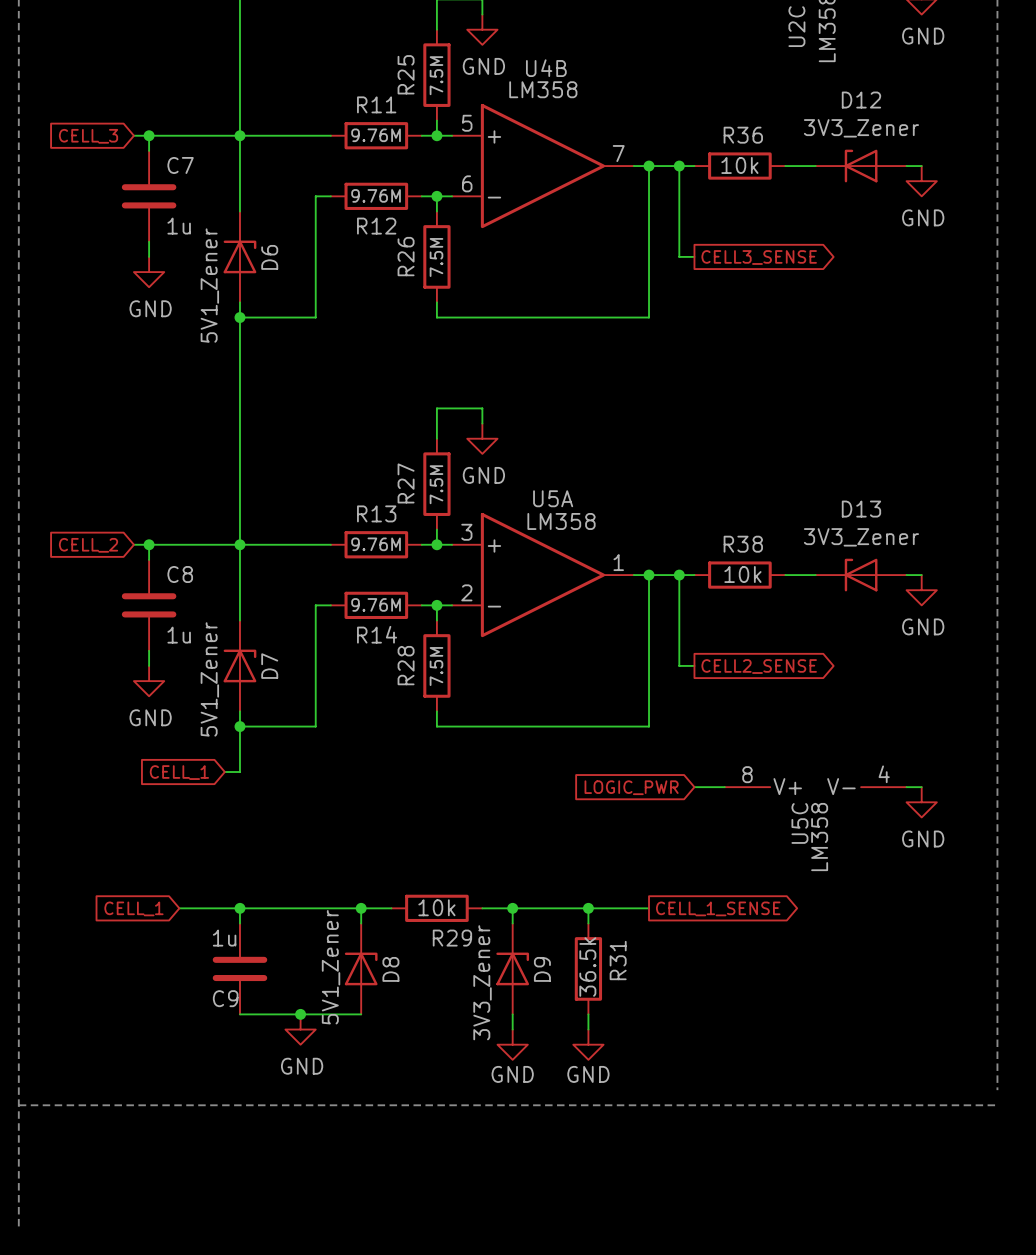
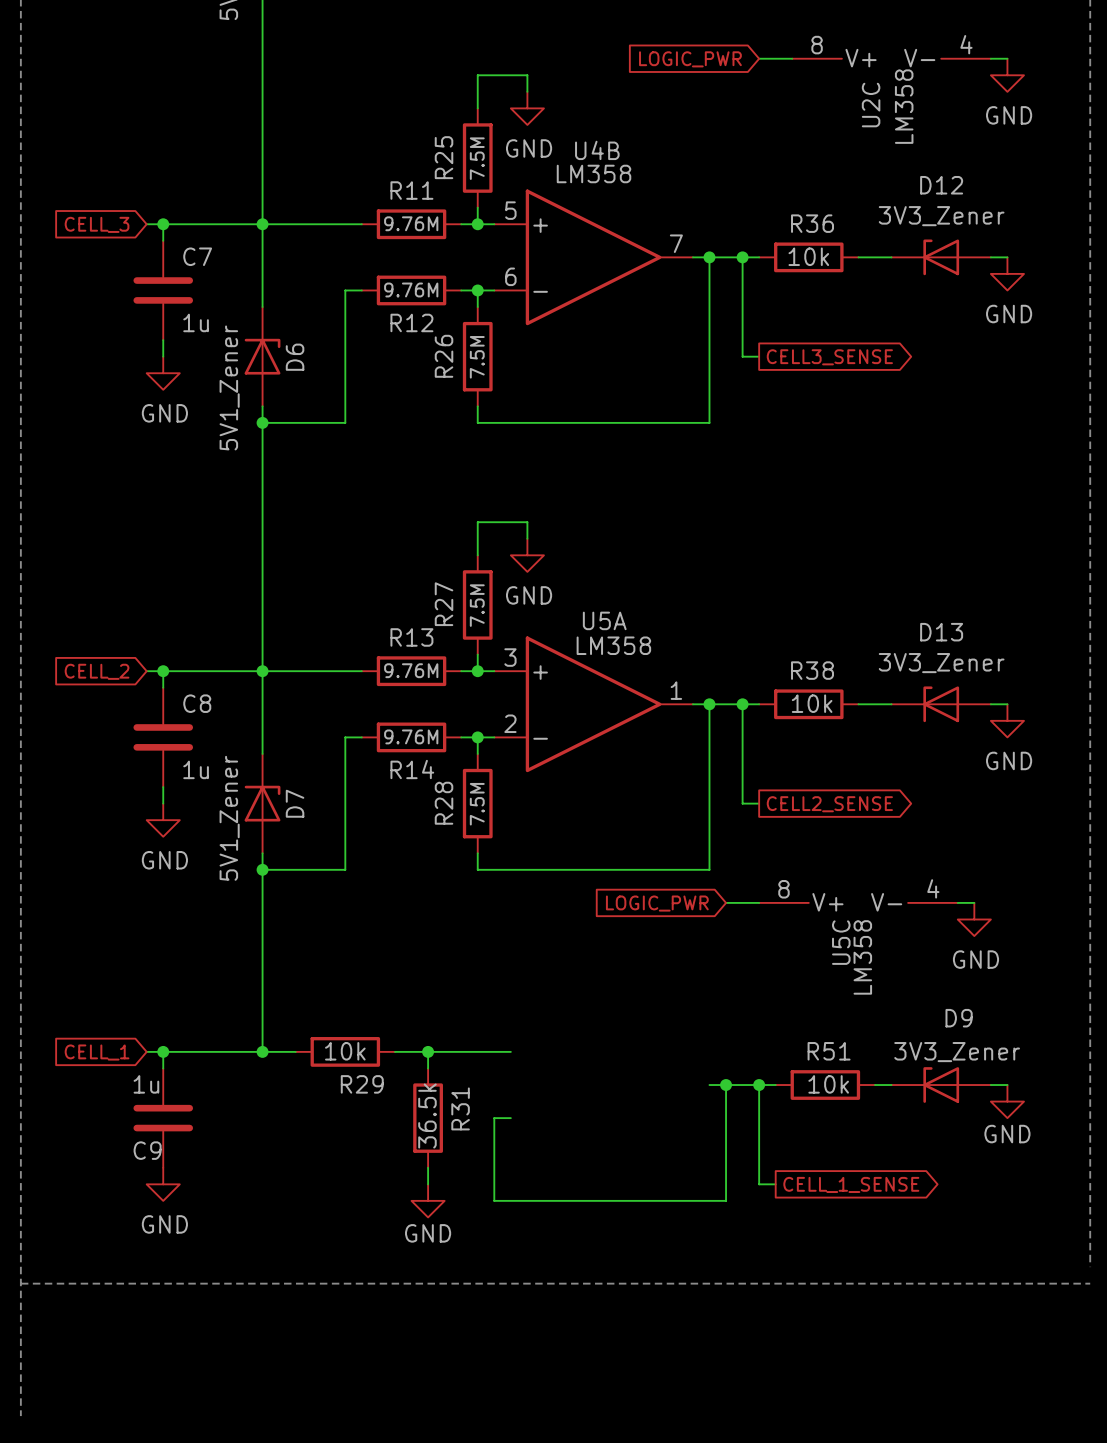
global label: CELL_1 (179, 772) -> none
wire: (224, 772) (239, 772) -> (262, 1051) (262, 919)
global label position: LOGIC_PWR (631, 787) -> LOGIC_PWR (657, 903)
wire: (694, 787) (724, 787) -> (726, 902) (759, 902)
U5C position: (815, 787) -> (858, 902)
wire: (906, 787) (921, 787) -> (957, 902) (974, 902)
power symbol position: GND (921, 802) -> GND (974, 919)
wire: none -> (146, 1051) (295, 1051)
junction: none -> (163, 1051)
wire: none -> (394, 1051) (510, 1051)
global label position: CELL_1 (133, 908) -> CELL_1 (97, 1052)
wire: (179, 908) (391, 908) -> (428, 1051) (428, 1068)
wire: (239, 908) (239, 923) -> (163, 1051) (163, 1068)
junction position: (239, 908) -> (262, 1051)
wire: (361, 908) (361, 923) -> none
junction position: (361, 908) -> (428, 1051)
R29 position: (436, 908) -> (345, 1051)
wire: (482, 908) (649, 908) -> none
wire: (512, 908) (512, 923) -> none
junction: (512, 908) -> none
wire: (588, 908) (588, 923) -> none
junction: (588, 908) -> none
global label position: CELL_1_SENSE (718, 908) -> CELL_1_SENSE (851, 1184)
wire: none -> (709, 1085) (775, 1085)
wire: none -> (726, 1085) (726, 1200) (494, 1200) (494, 1118) (510, 1118)
junction: none -> (726, 1085)
wire: none -> (759, 1085) (759, 1184) (775, 1184)
junction: none -> (759, 1085)
R51: none -> 10k (825, 1085)
wire: none -> (875, 1085) (891, 1085)
wire: none -> (990, 1085) (1007, 1085)
power symbol: none -> GND (1007, 1101)
C9 position: (239, 968) -> (163, 1118)
D8: 5V1_Zener (361, 968) -> none
D9 rotation: 0° (512, 968) -> 90° counterclockwise (941, 1085)
D9 position: (512, 968) -> (941, 1085)
R31 position: (588, 968) -> (428, 1118)
D9 name position: D9 (542, 969) -> D9 (959, 1018)
D9 value position: 3V3_Zener (482, 982) -> 3V3_Zener (957, 1052)
power symbol: none -> GND (163, 1184)
wire: (239, 1014) (361, 1014) -> none
junction: (300, 1014) -> none
wire: (512, 1014) (512, 1029) -> (428, 1167) (428, 1184)
wire: (588, 1014) (588, 1029) -> none
power symbol: GND (300, 1029) -> none
power symbol: none -> GND (428, 1200)
power symbol: GND (512, 1044) -> none
power symbol: GND (588, 1044) -> none

